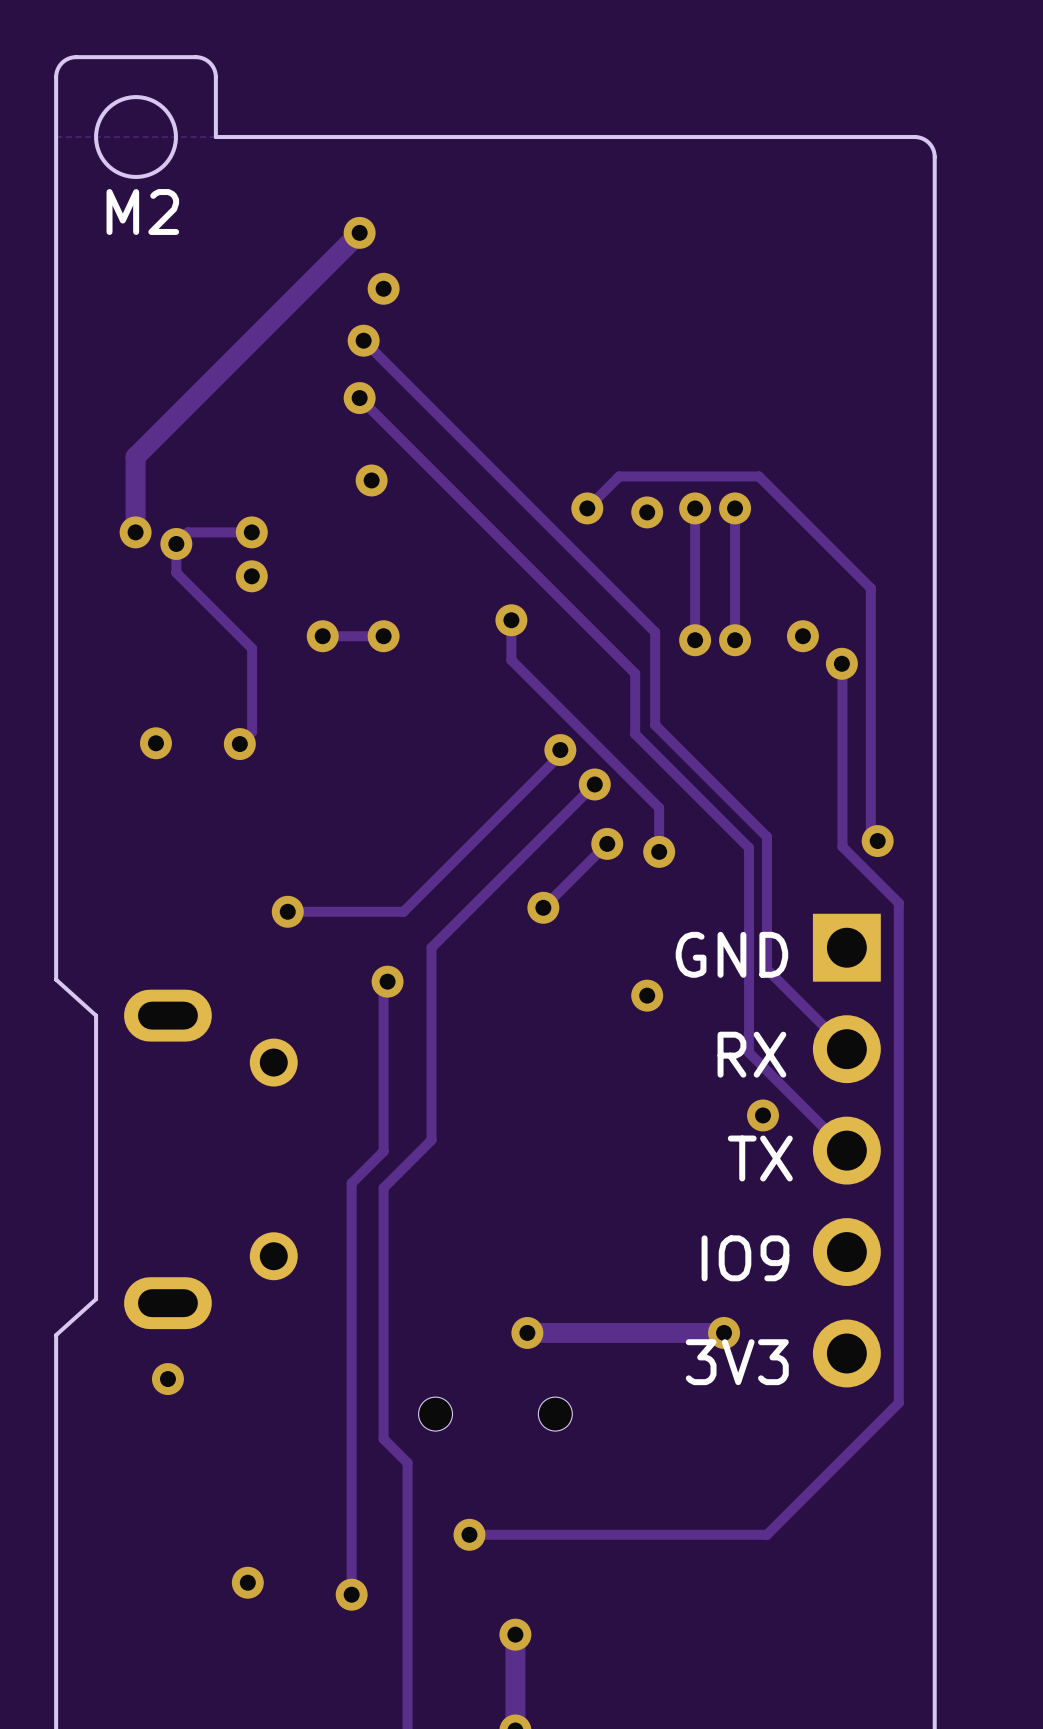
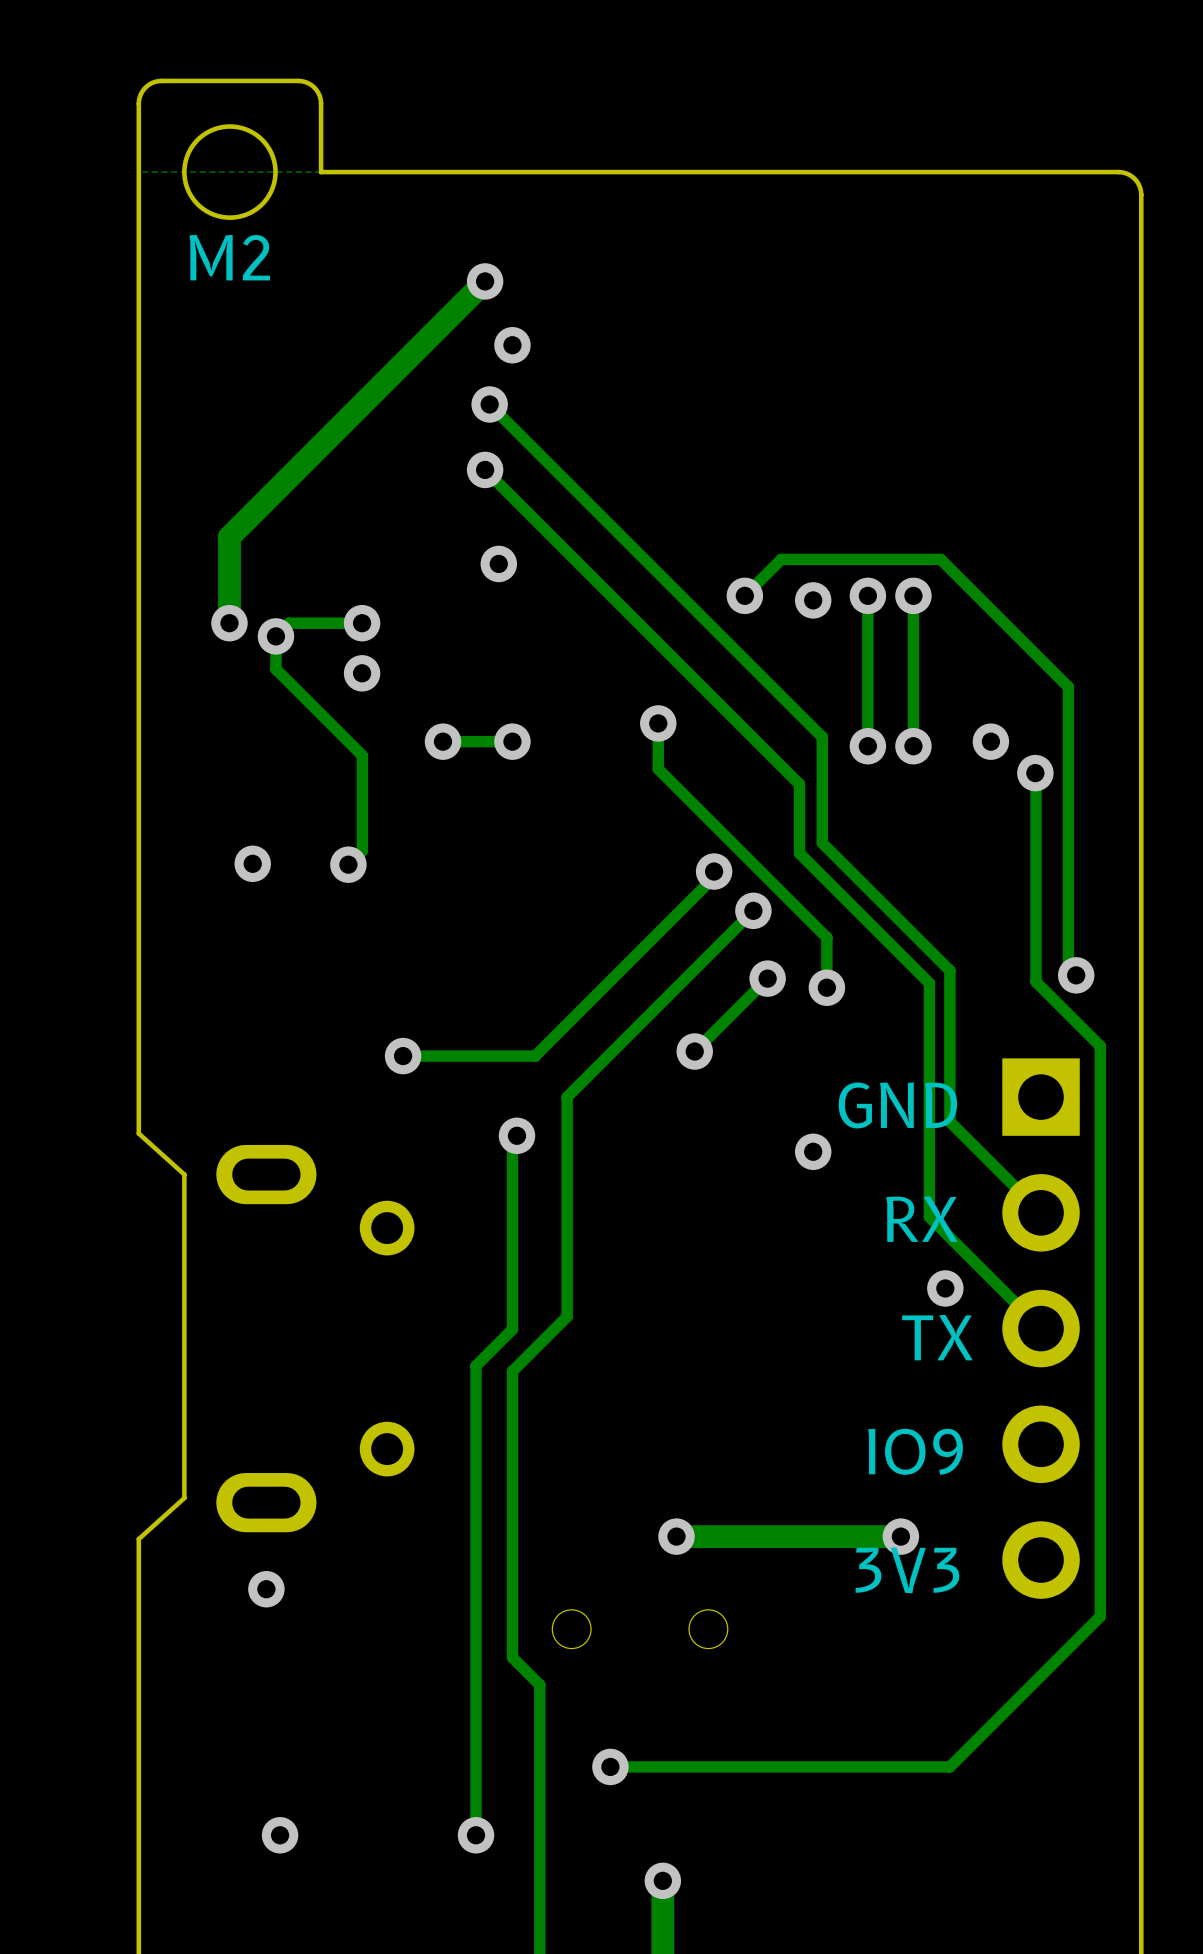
via position: (247, 1582) -> (280, 1835)

